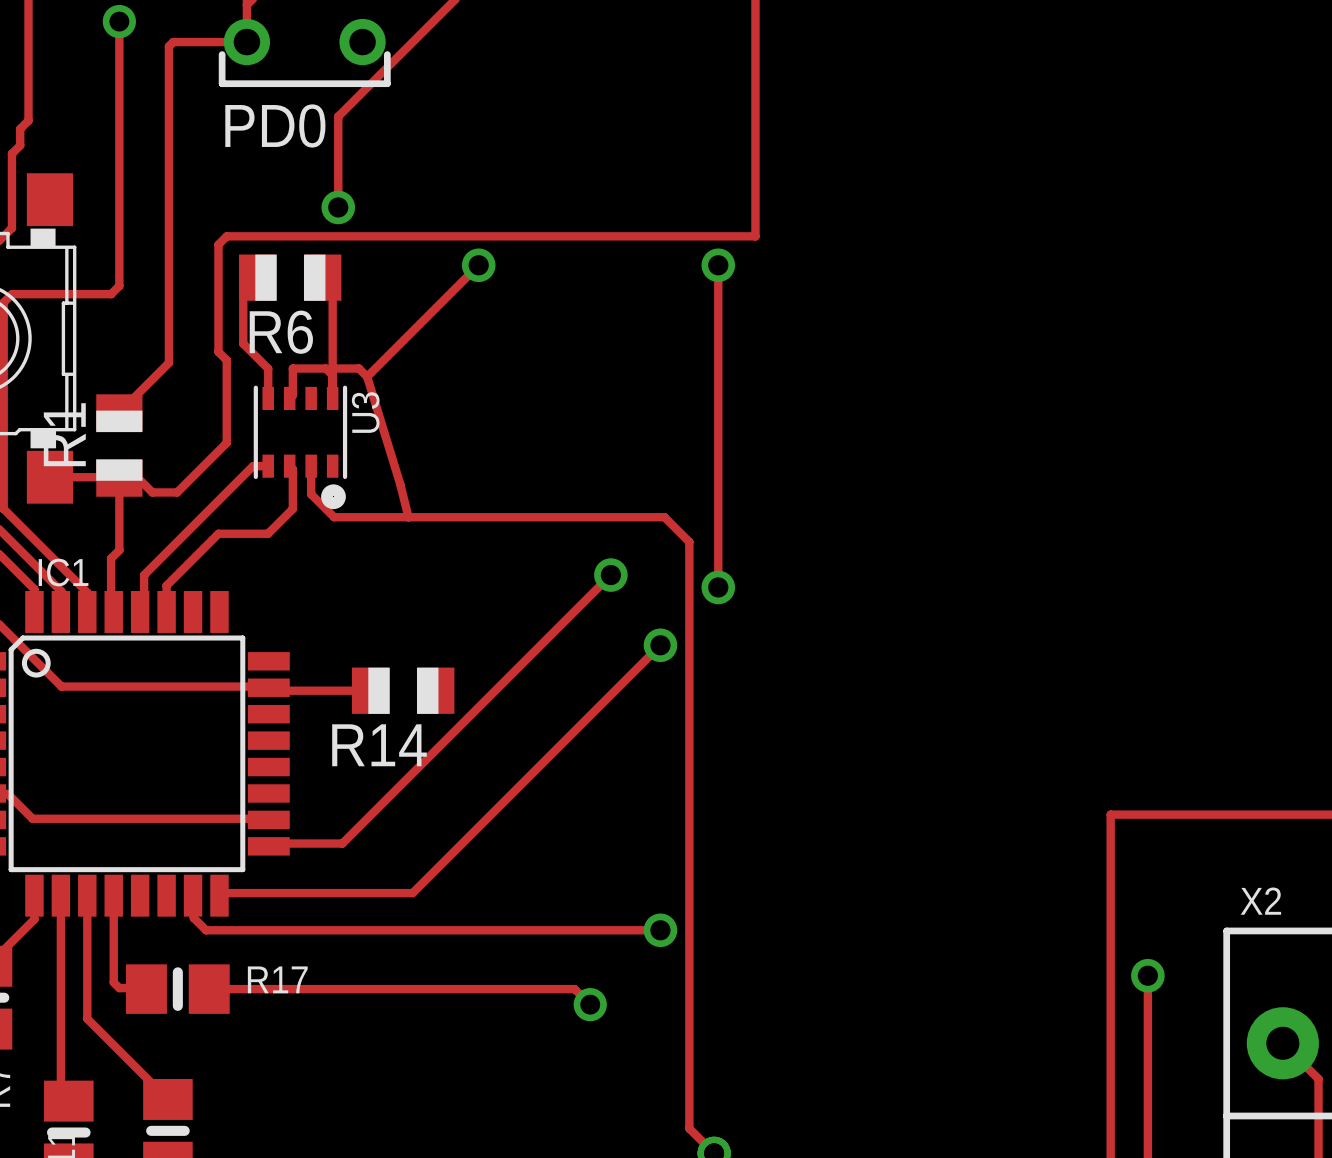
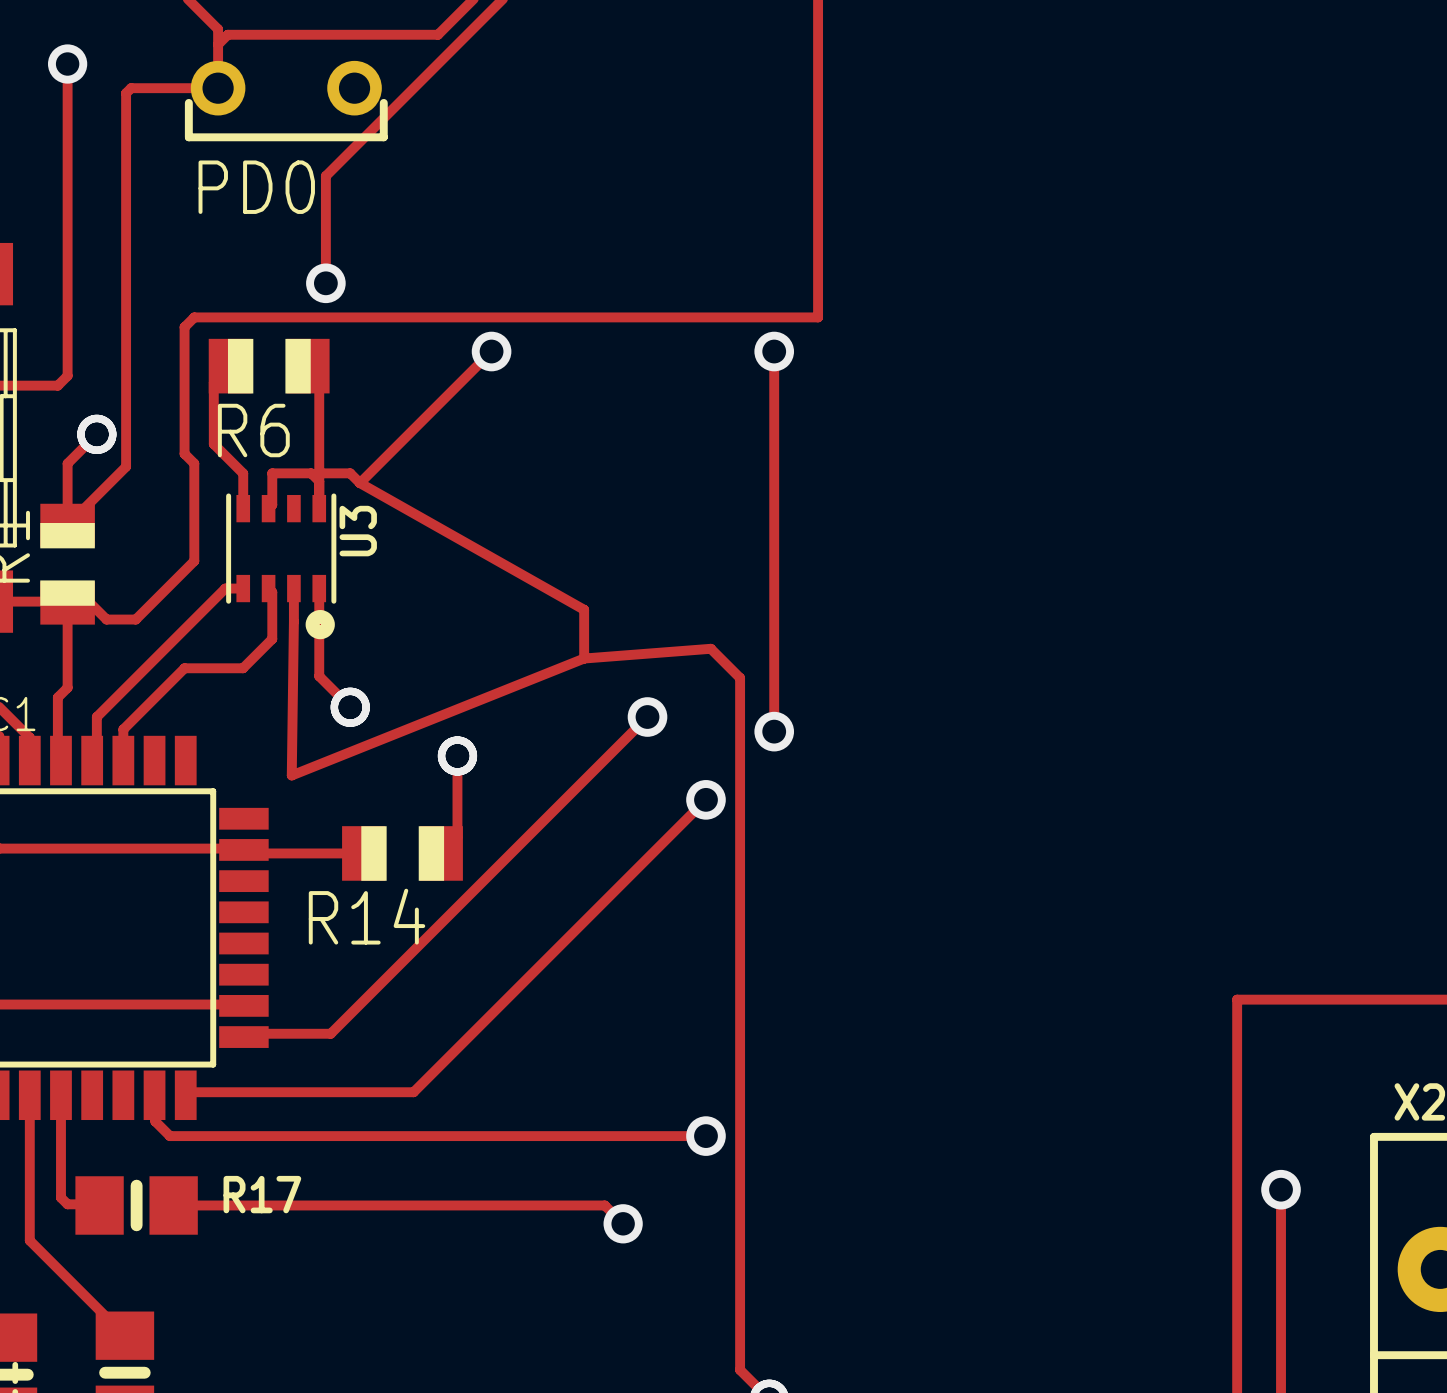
track: none -> (96, 434) (67, 463) (67, 525)
via: none -> (96, 434)
track: (367, 376) (408, 517) -> (359, 483) (584, 609) (584, 658)
track: none -> (319, 588) (319, 676) (350, 707)
track: (311, 494) (334, 517) (664, 517) -> (293, 621) (291, 775) (584, 658)
track: none -> (710, 648) (584, 658)
via: none -> (350, 707)
track: none -> (457, 755) (457, 837) (441, 853)
via: none -> (457, 755)

